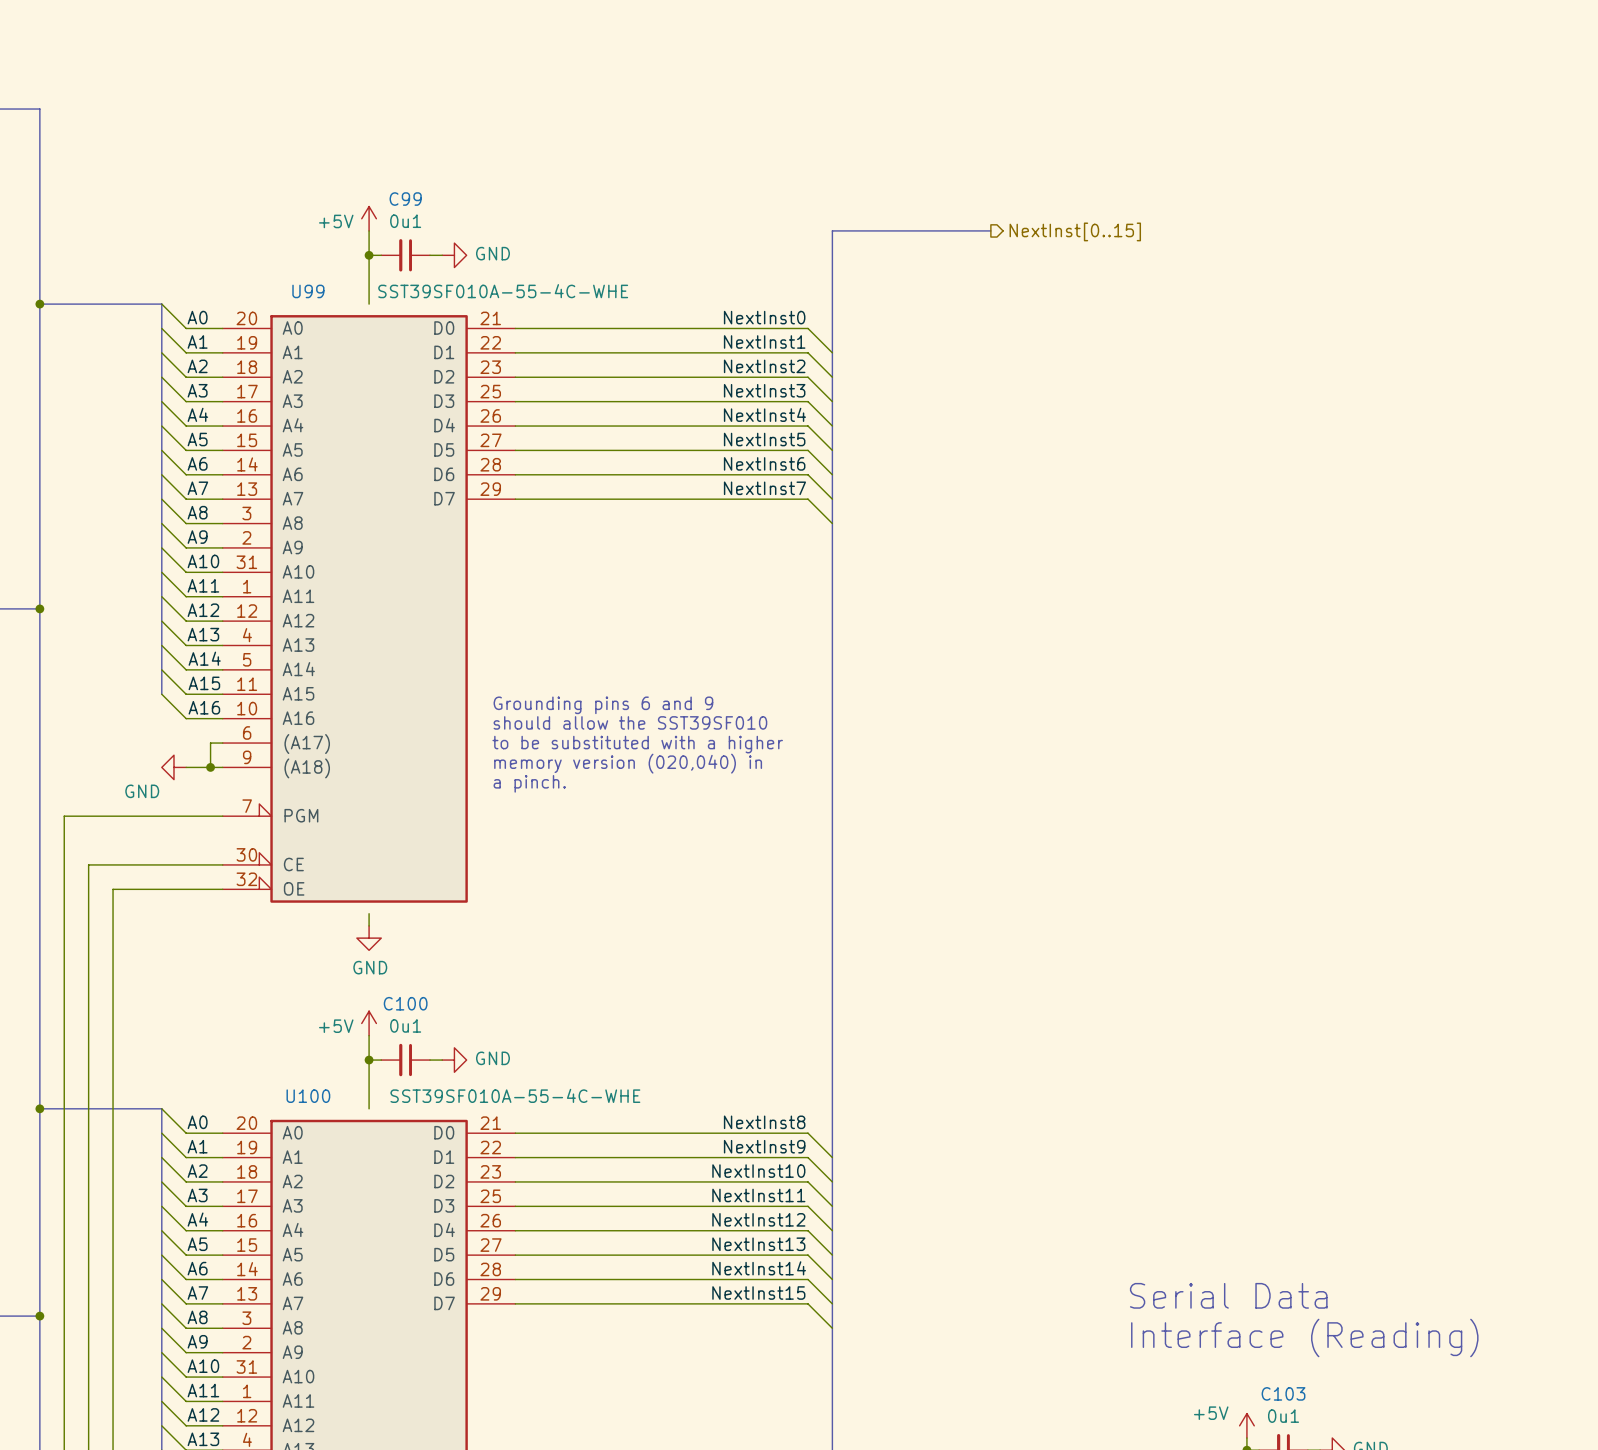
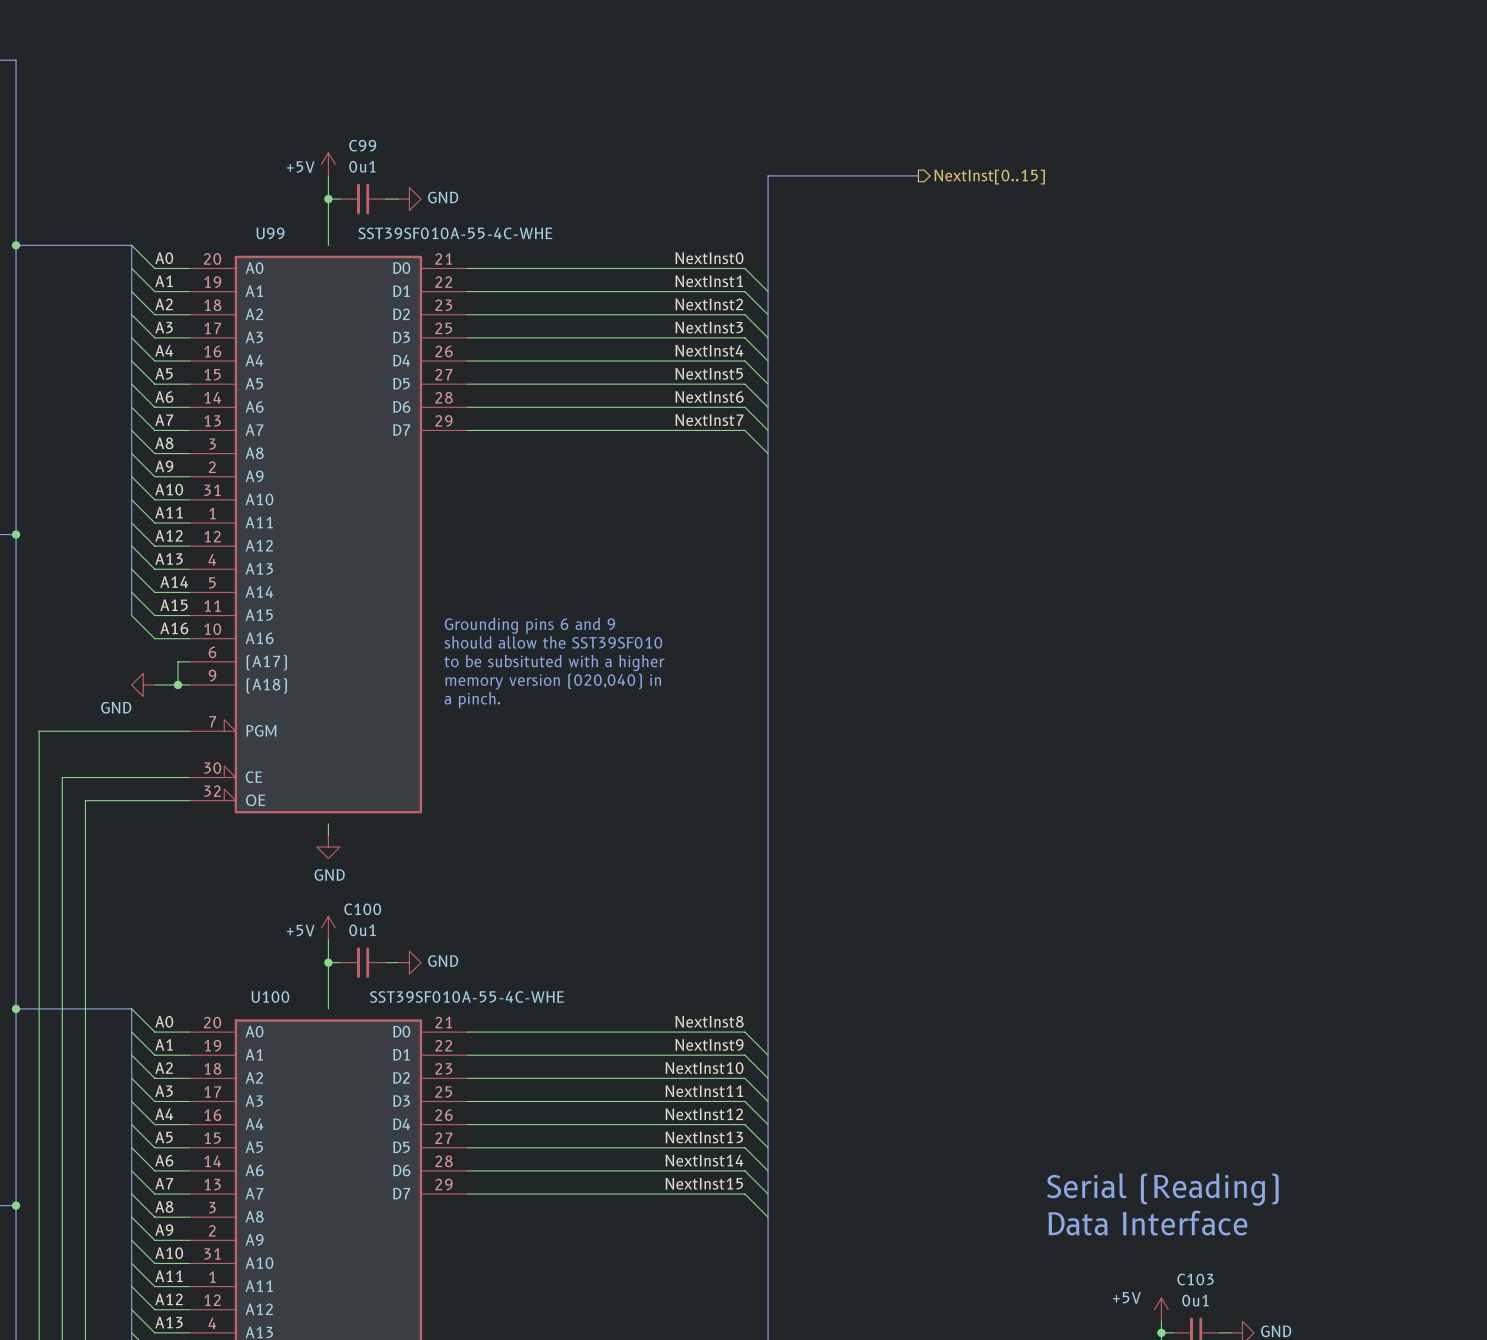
text: to be substituted with a higher (637, 744) -> to be subsituted with a higher (554, 662)
text: Serial Data (1228, 1295) -> Serial (Reading) (1162, 1189)
text: Interface (Reading) (1304, 1337) -> Data Interface (1147, 1223)

